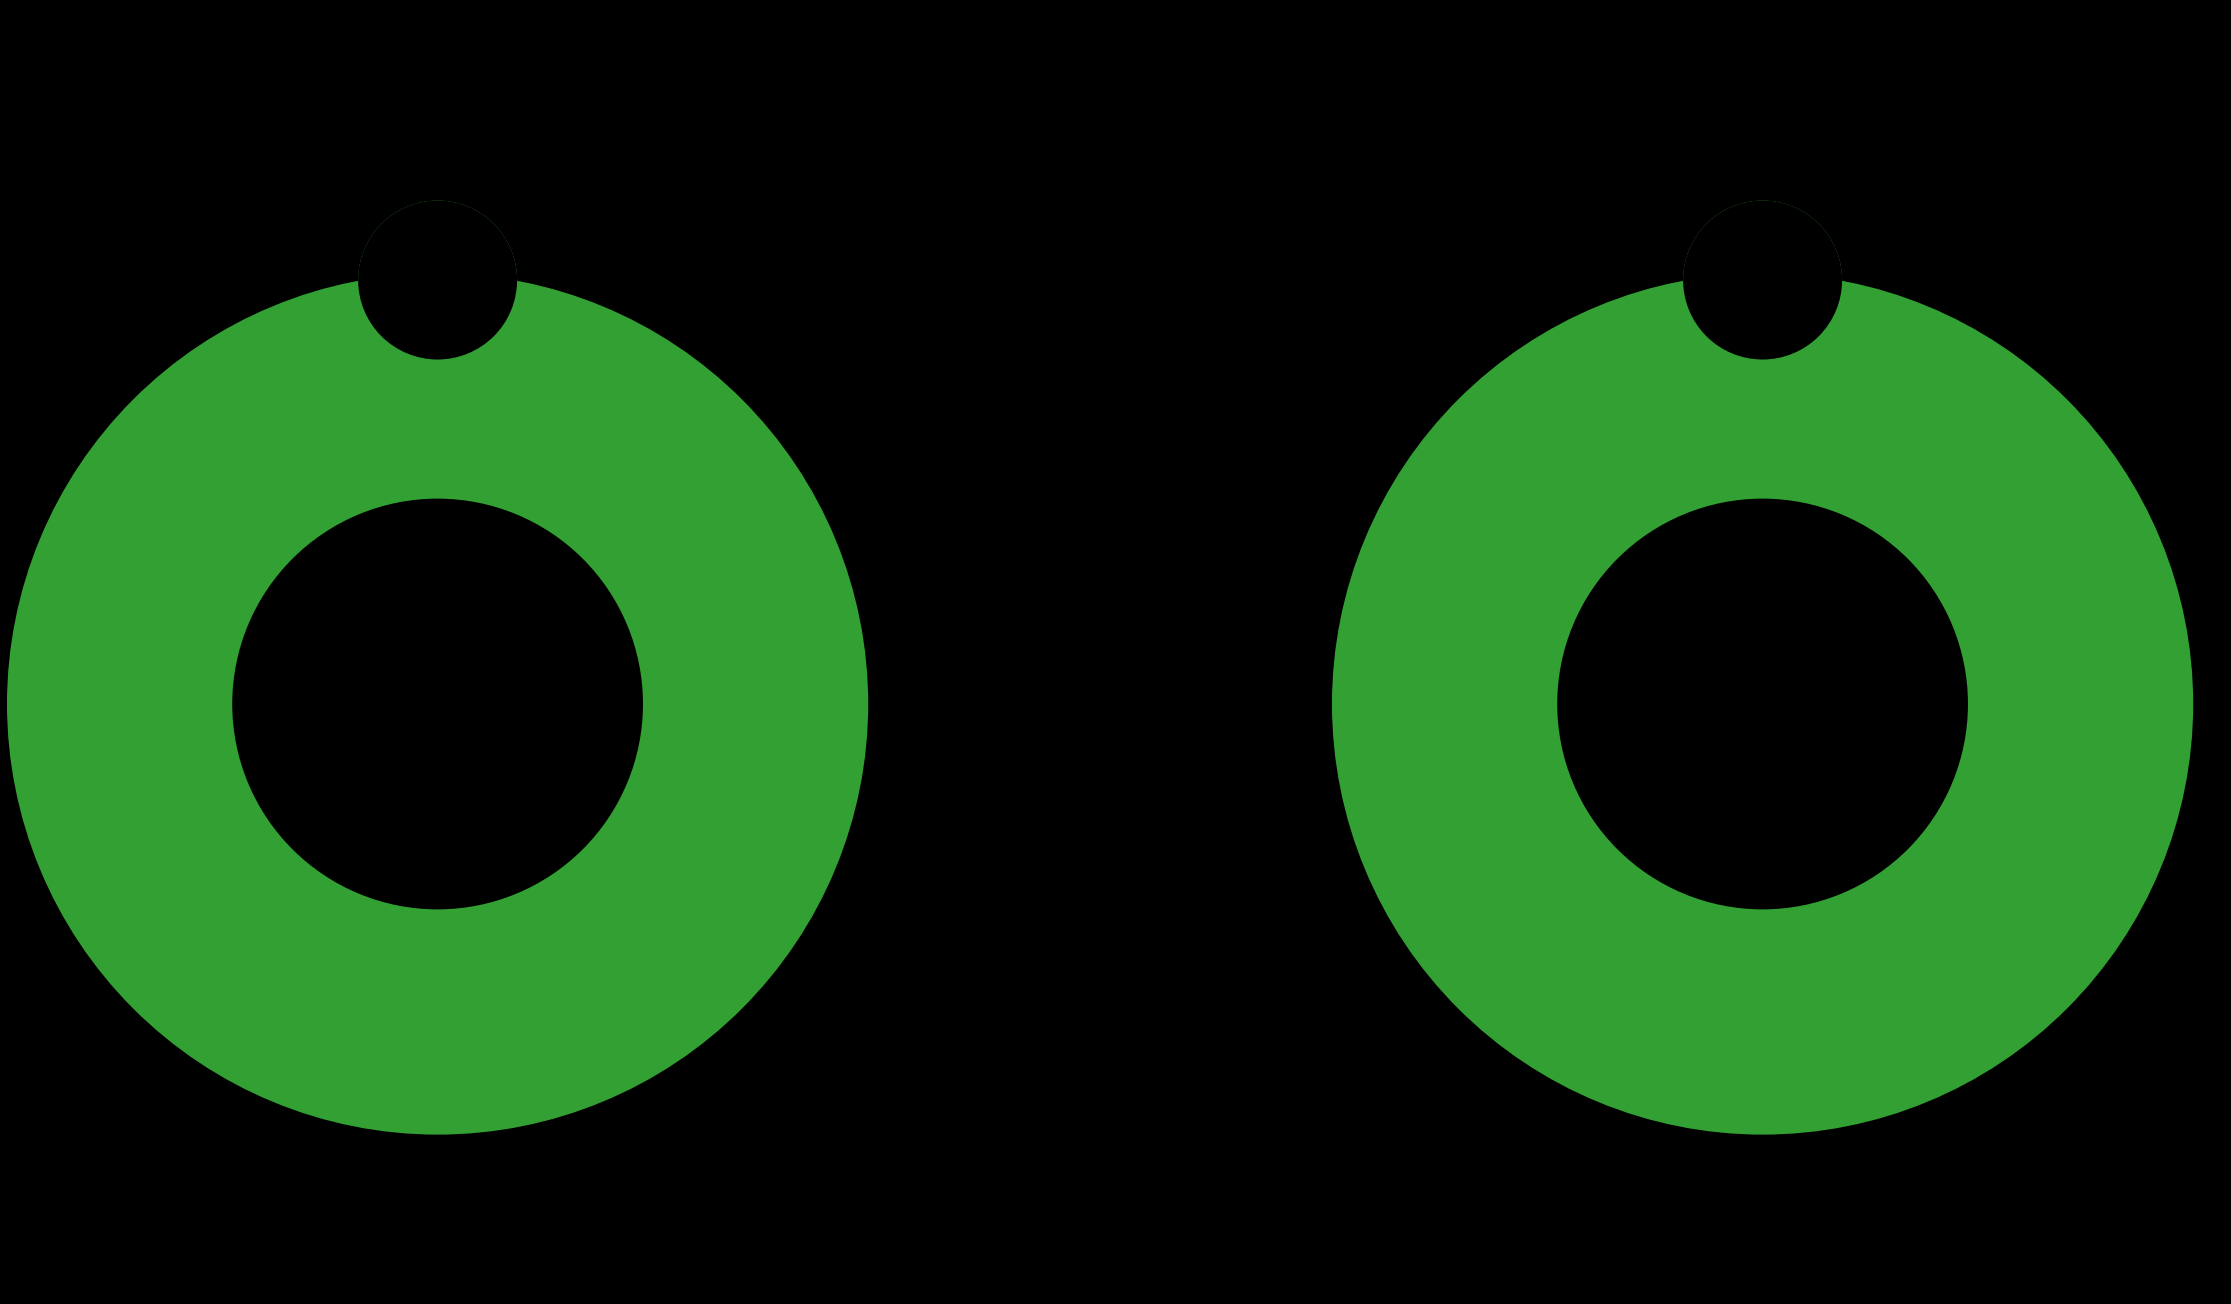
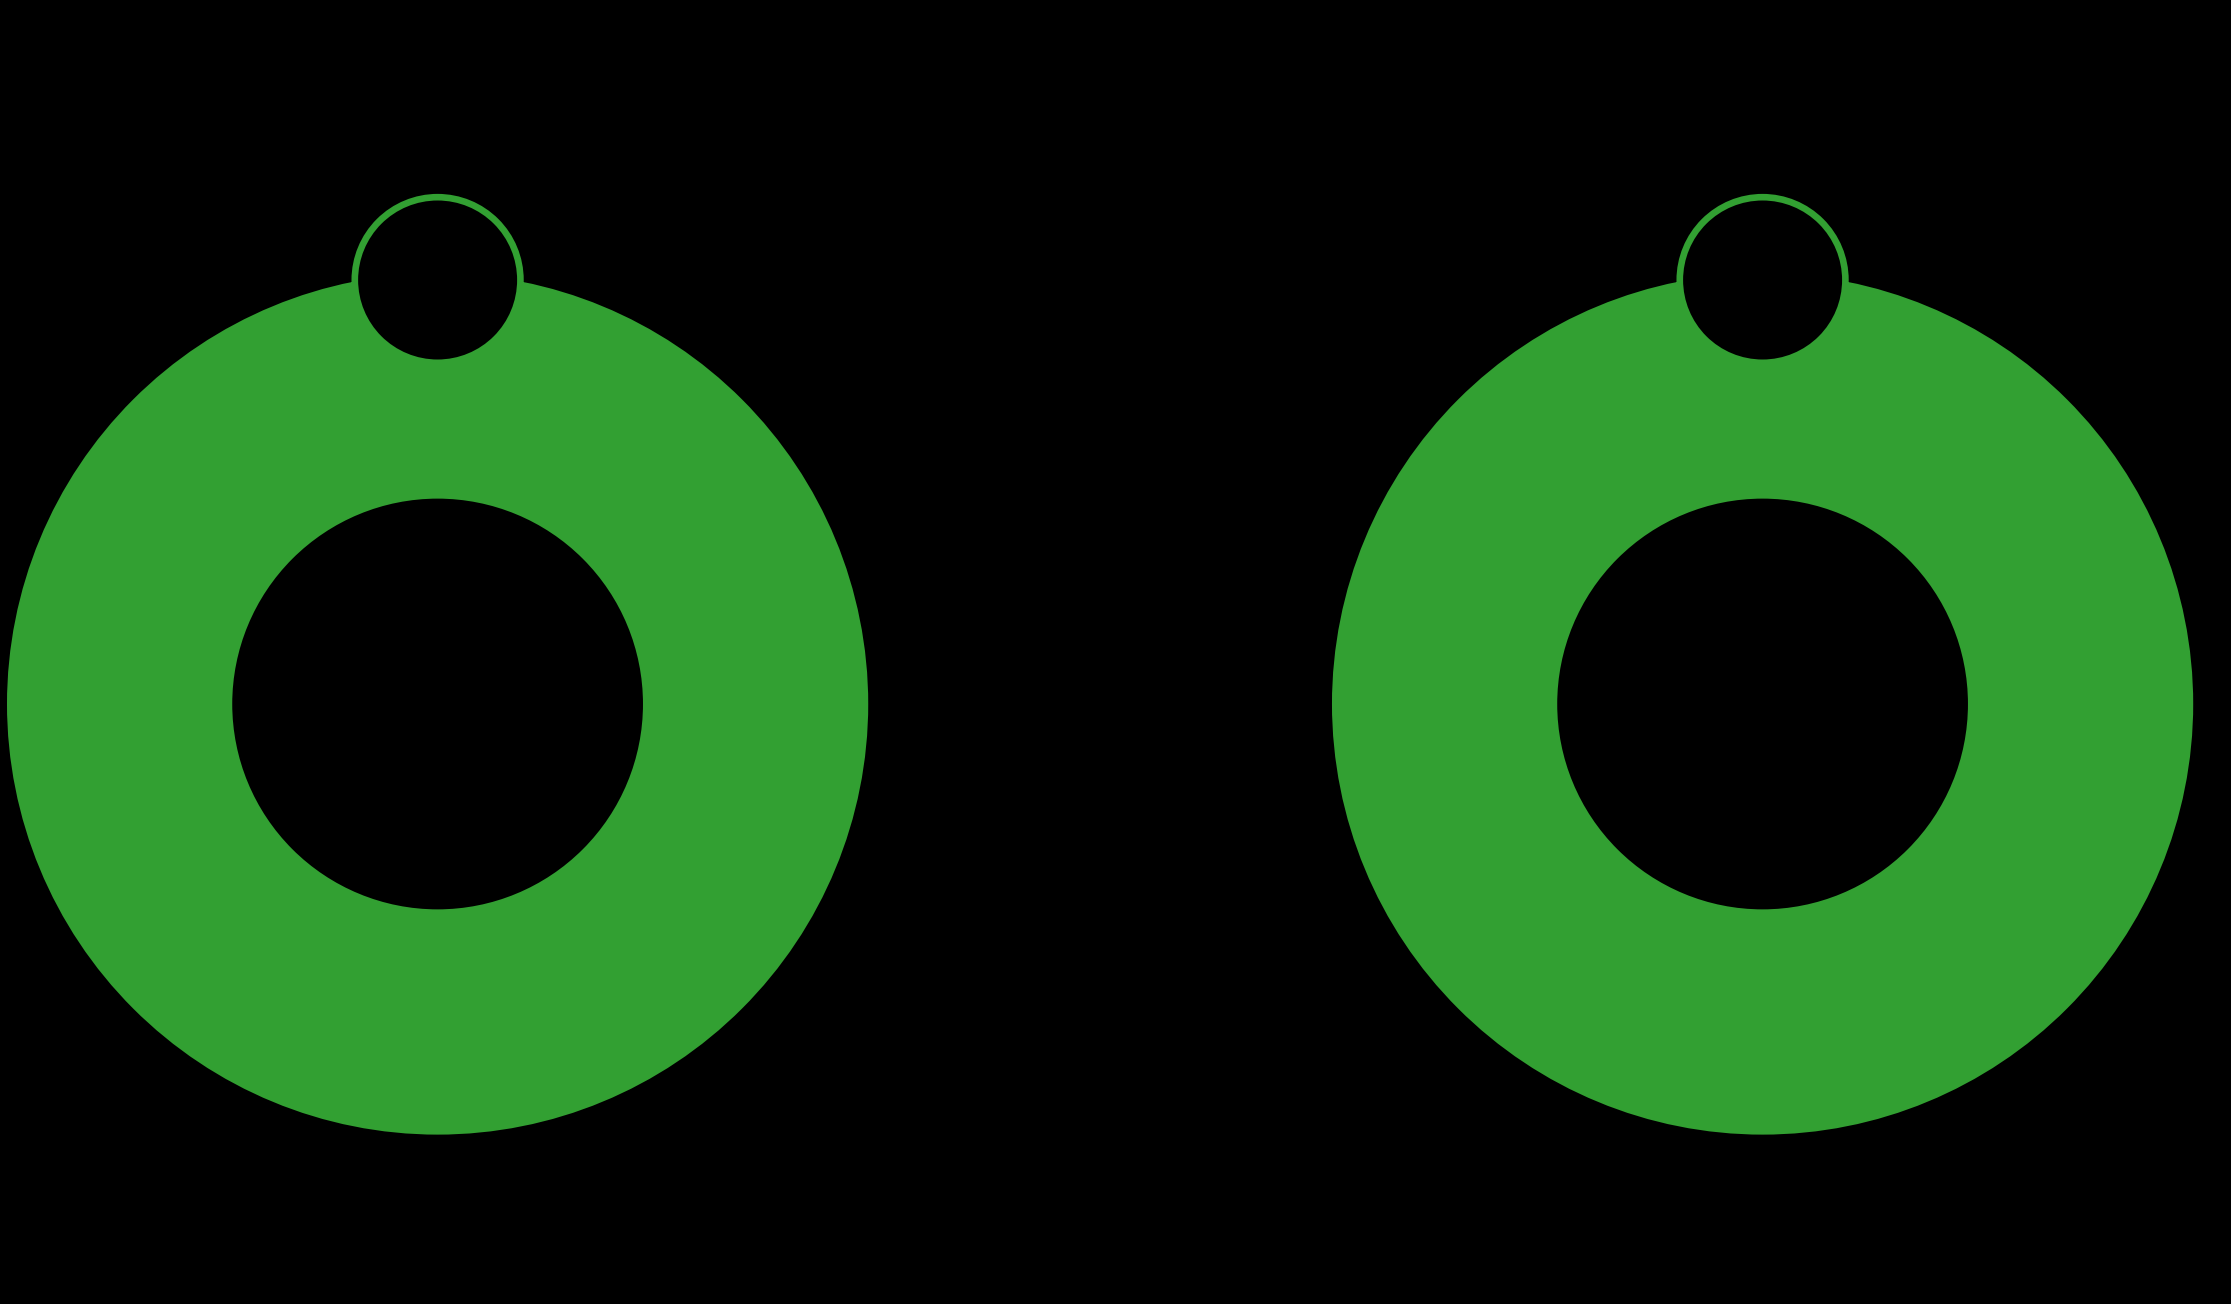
part footprint: [6, 200, 869, 1135] -> [6, 193, 869, 1135]
part footprint: [1331, 200, 2194, 1135] -> [1331, 193, 2194, 1135]

